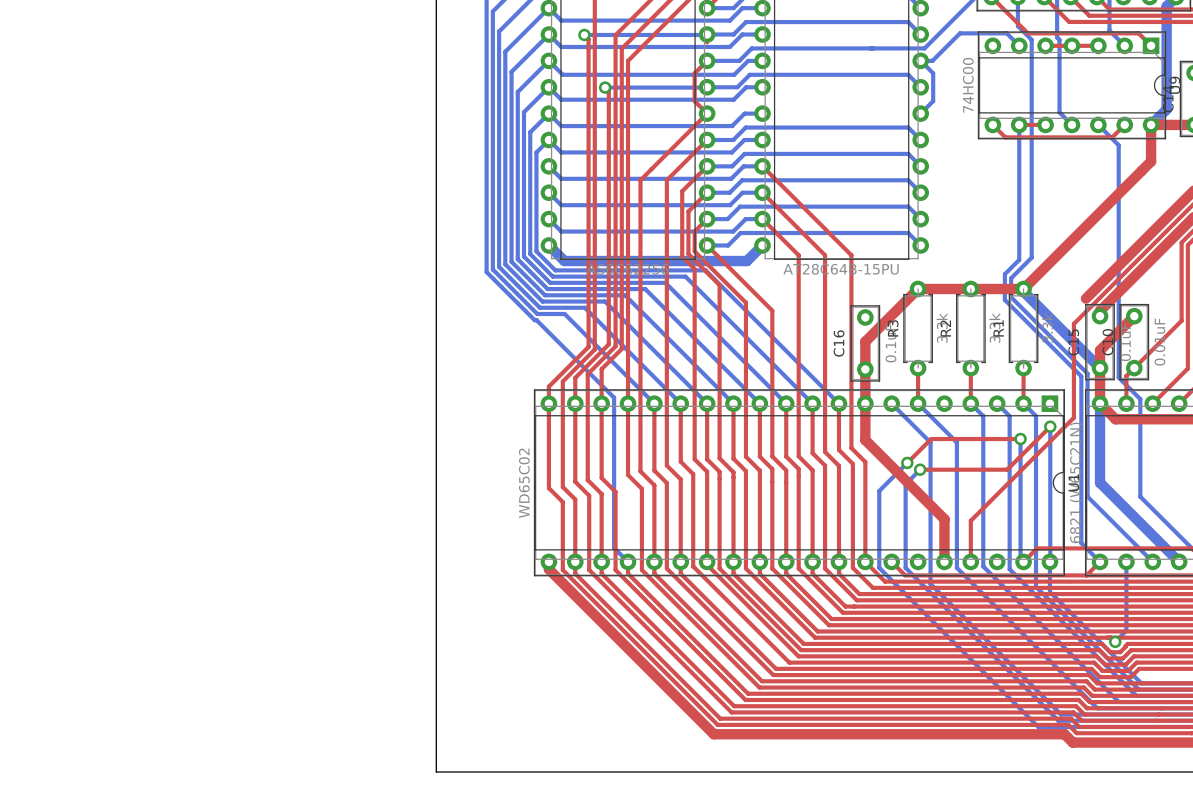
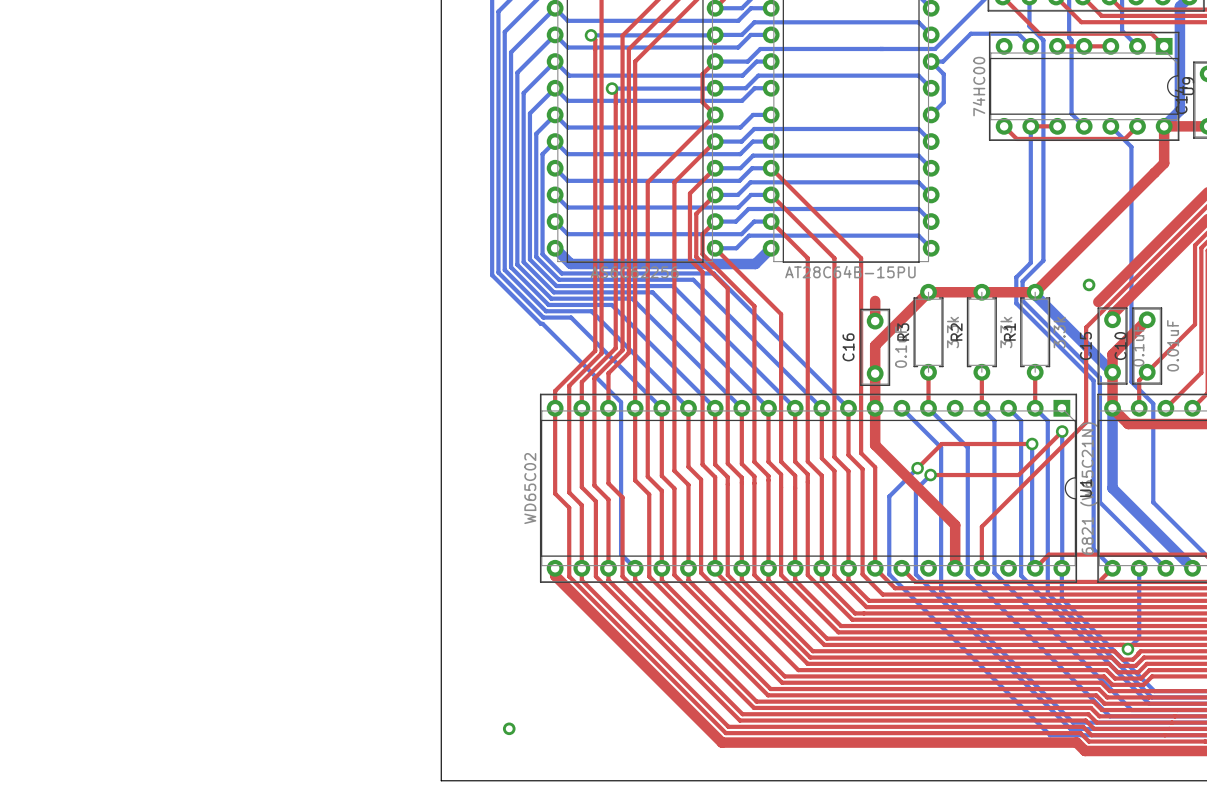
via: none -> (1089, 284)
top track: none -> (875, 300) (875, 321)
via: none -> (509, 728)

